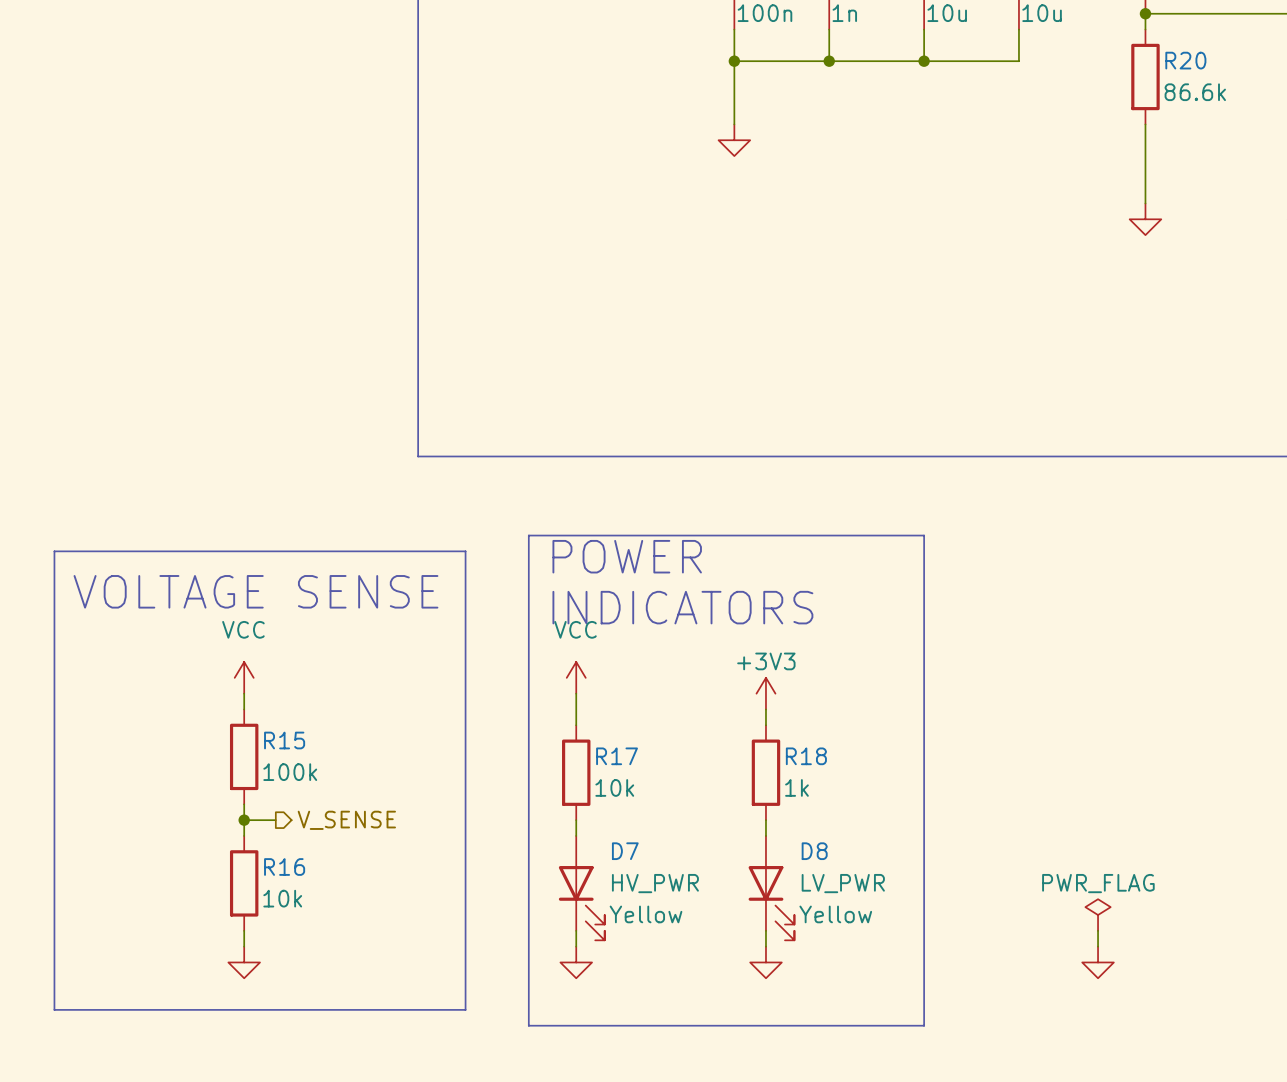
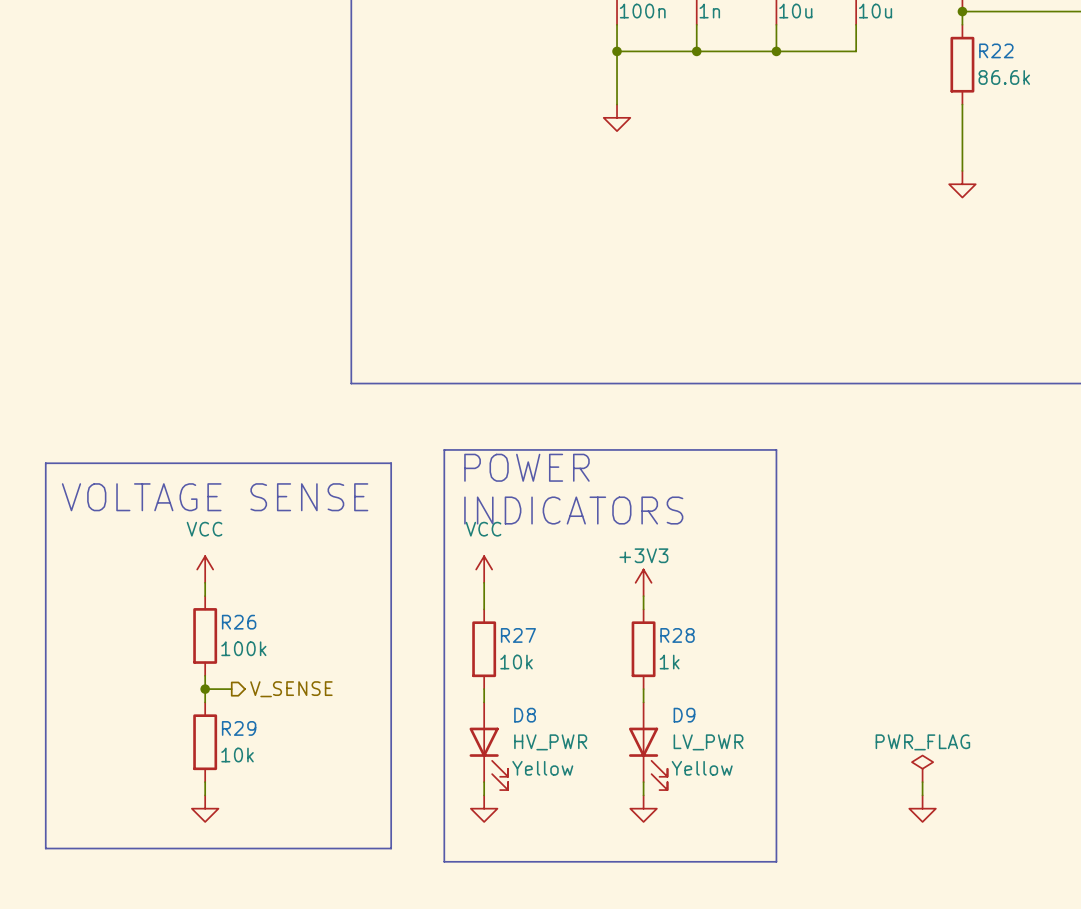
R20 name: R20 (1185, 60) -> R22 (996, 50)
R15 name: R15 (284, 740) -> R26 (239, 622)
R17 name: R17 (617, 756) -> R27 (518, 635)
R18 name: R18 (806, 756) -> R28 (677, 635)
D7 name: D7 (625, 851) -> D8 (525, 715)
D8 name: D8 (814, 851) -> D9 (684, 715)
R16 name: R16 (284, 867) -> R29 (239, 728)

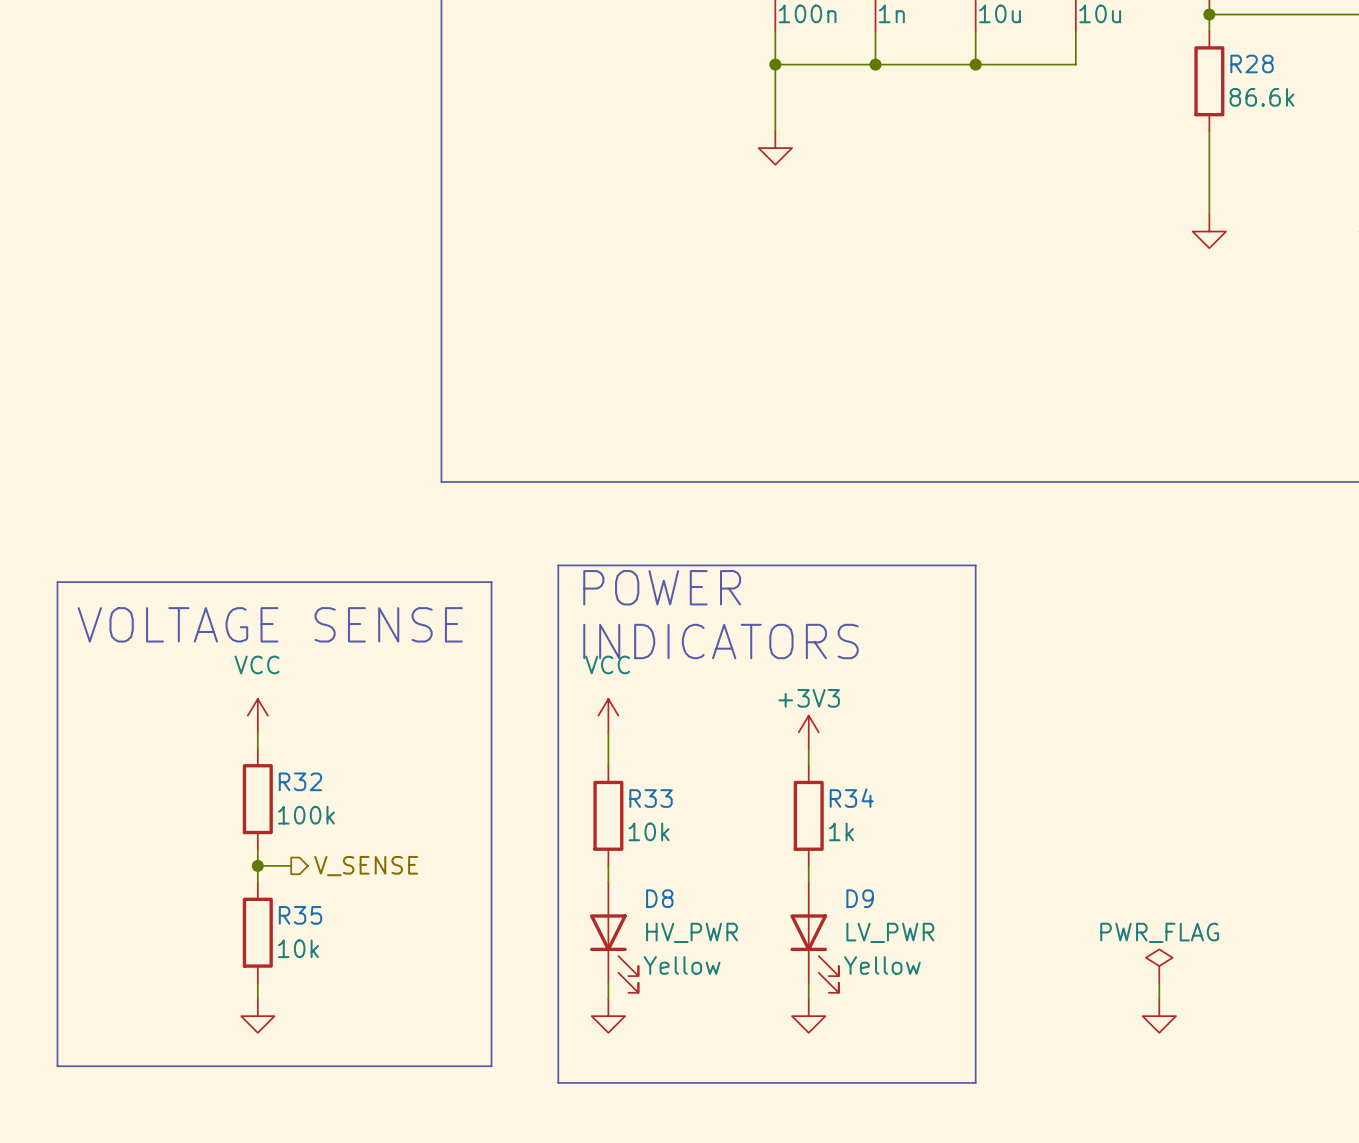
R22 name: R22 (996, 50) -> R28 (1252, 63)
R26 name: R26 (239, 622) -> R32 (300, 781)
R27 name: R27 (518, 635) -> R33 (651, 798)
R28 name: R28 (677, 635) -> R34 (851, 798)
R29 name: R29 (239, 728) -> R35 (300, 915)

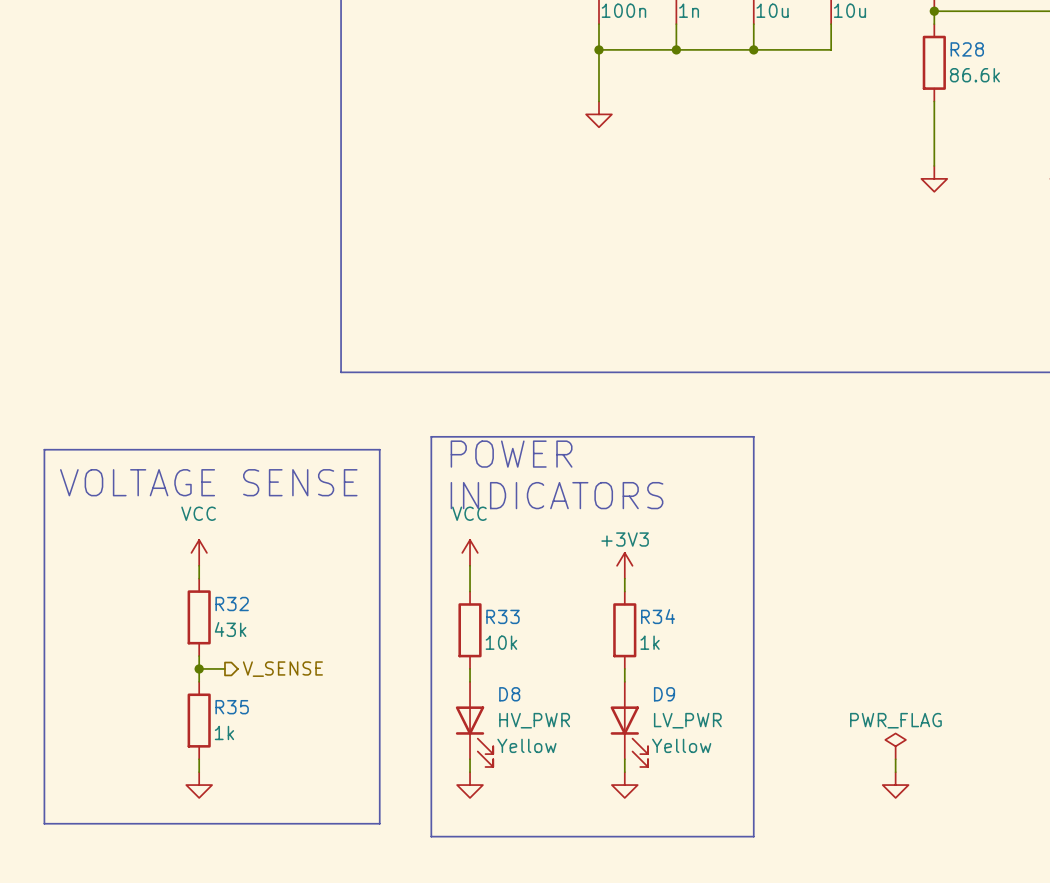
R32 value: 100k (306, 815) -> 43k (230, 629)
R35 value: 10k (298, 948) -> 1k (224, 732)

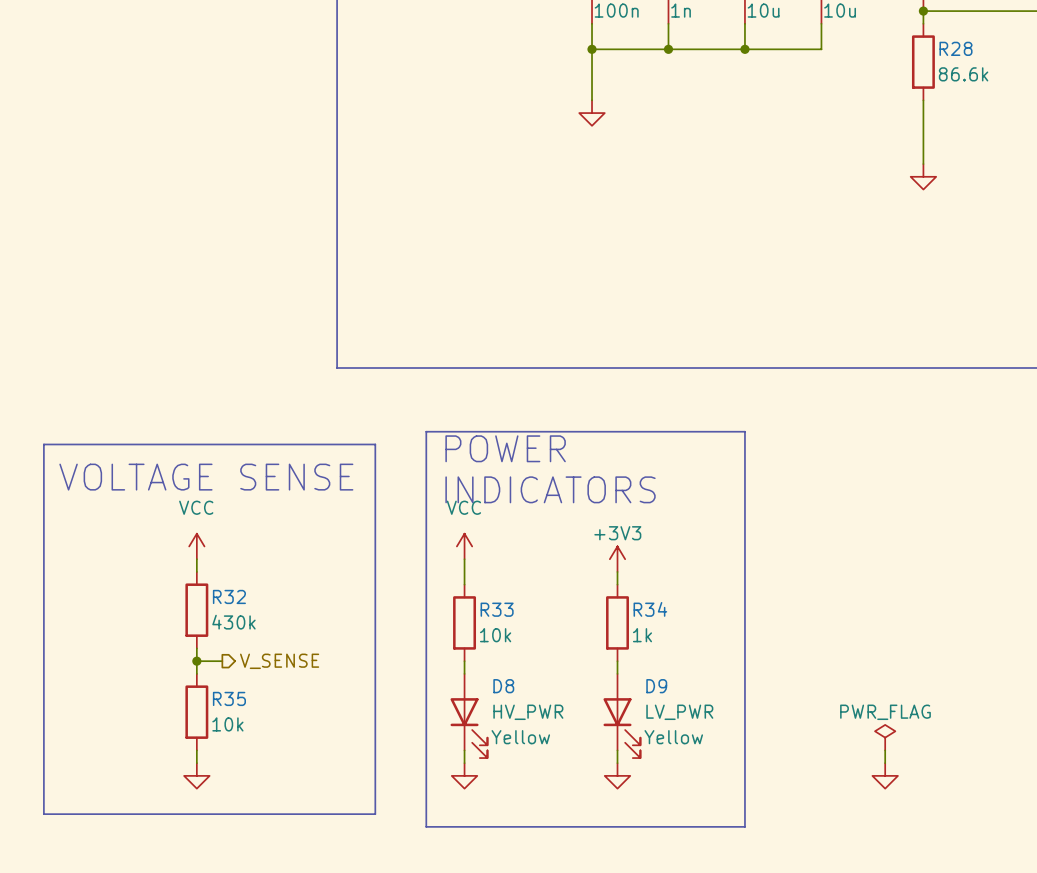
R32 value: 43k (230, 629) -> 430k (233, 622)
R35 value: 1k (224, 732) -> 10k (227, 724)

